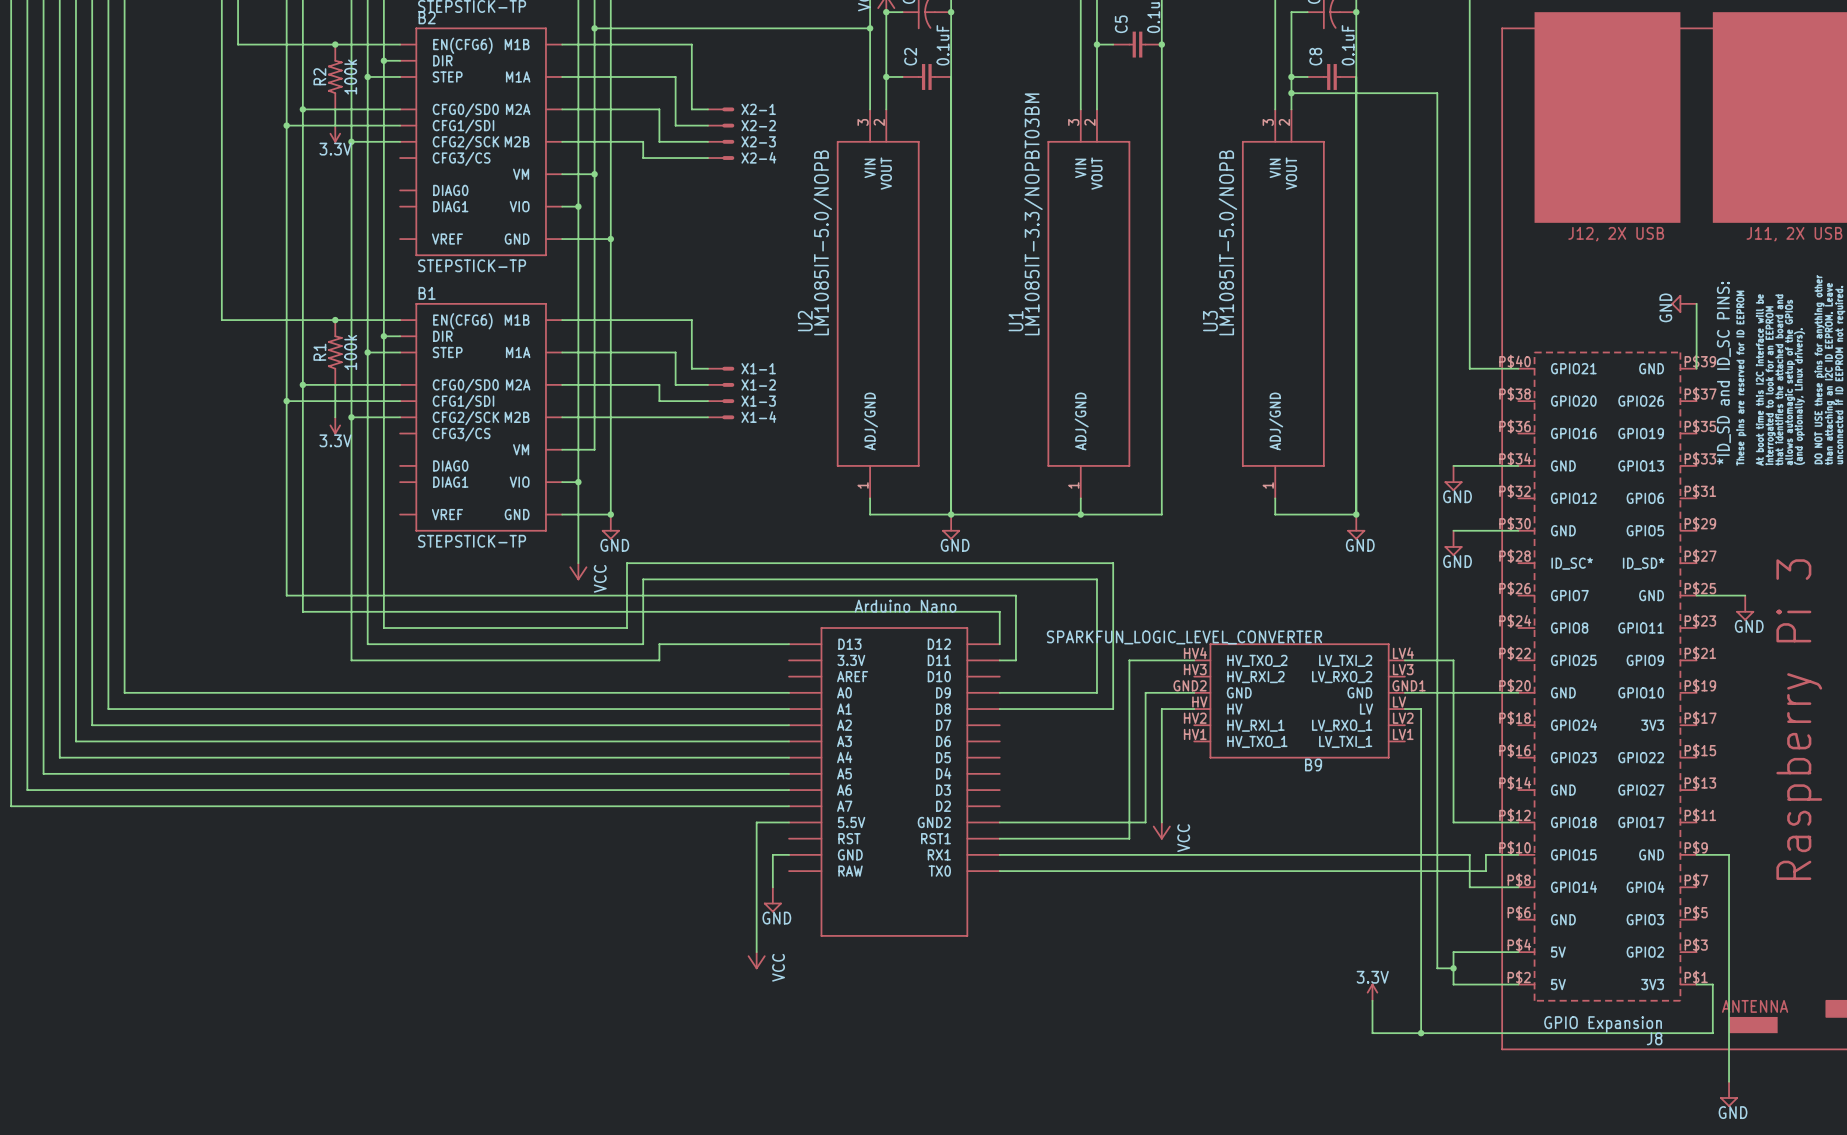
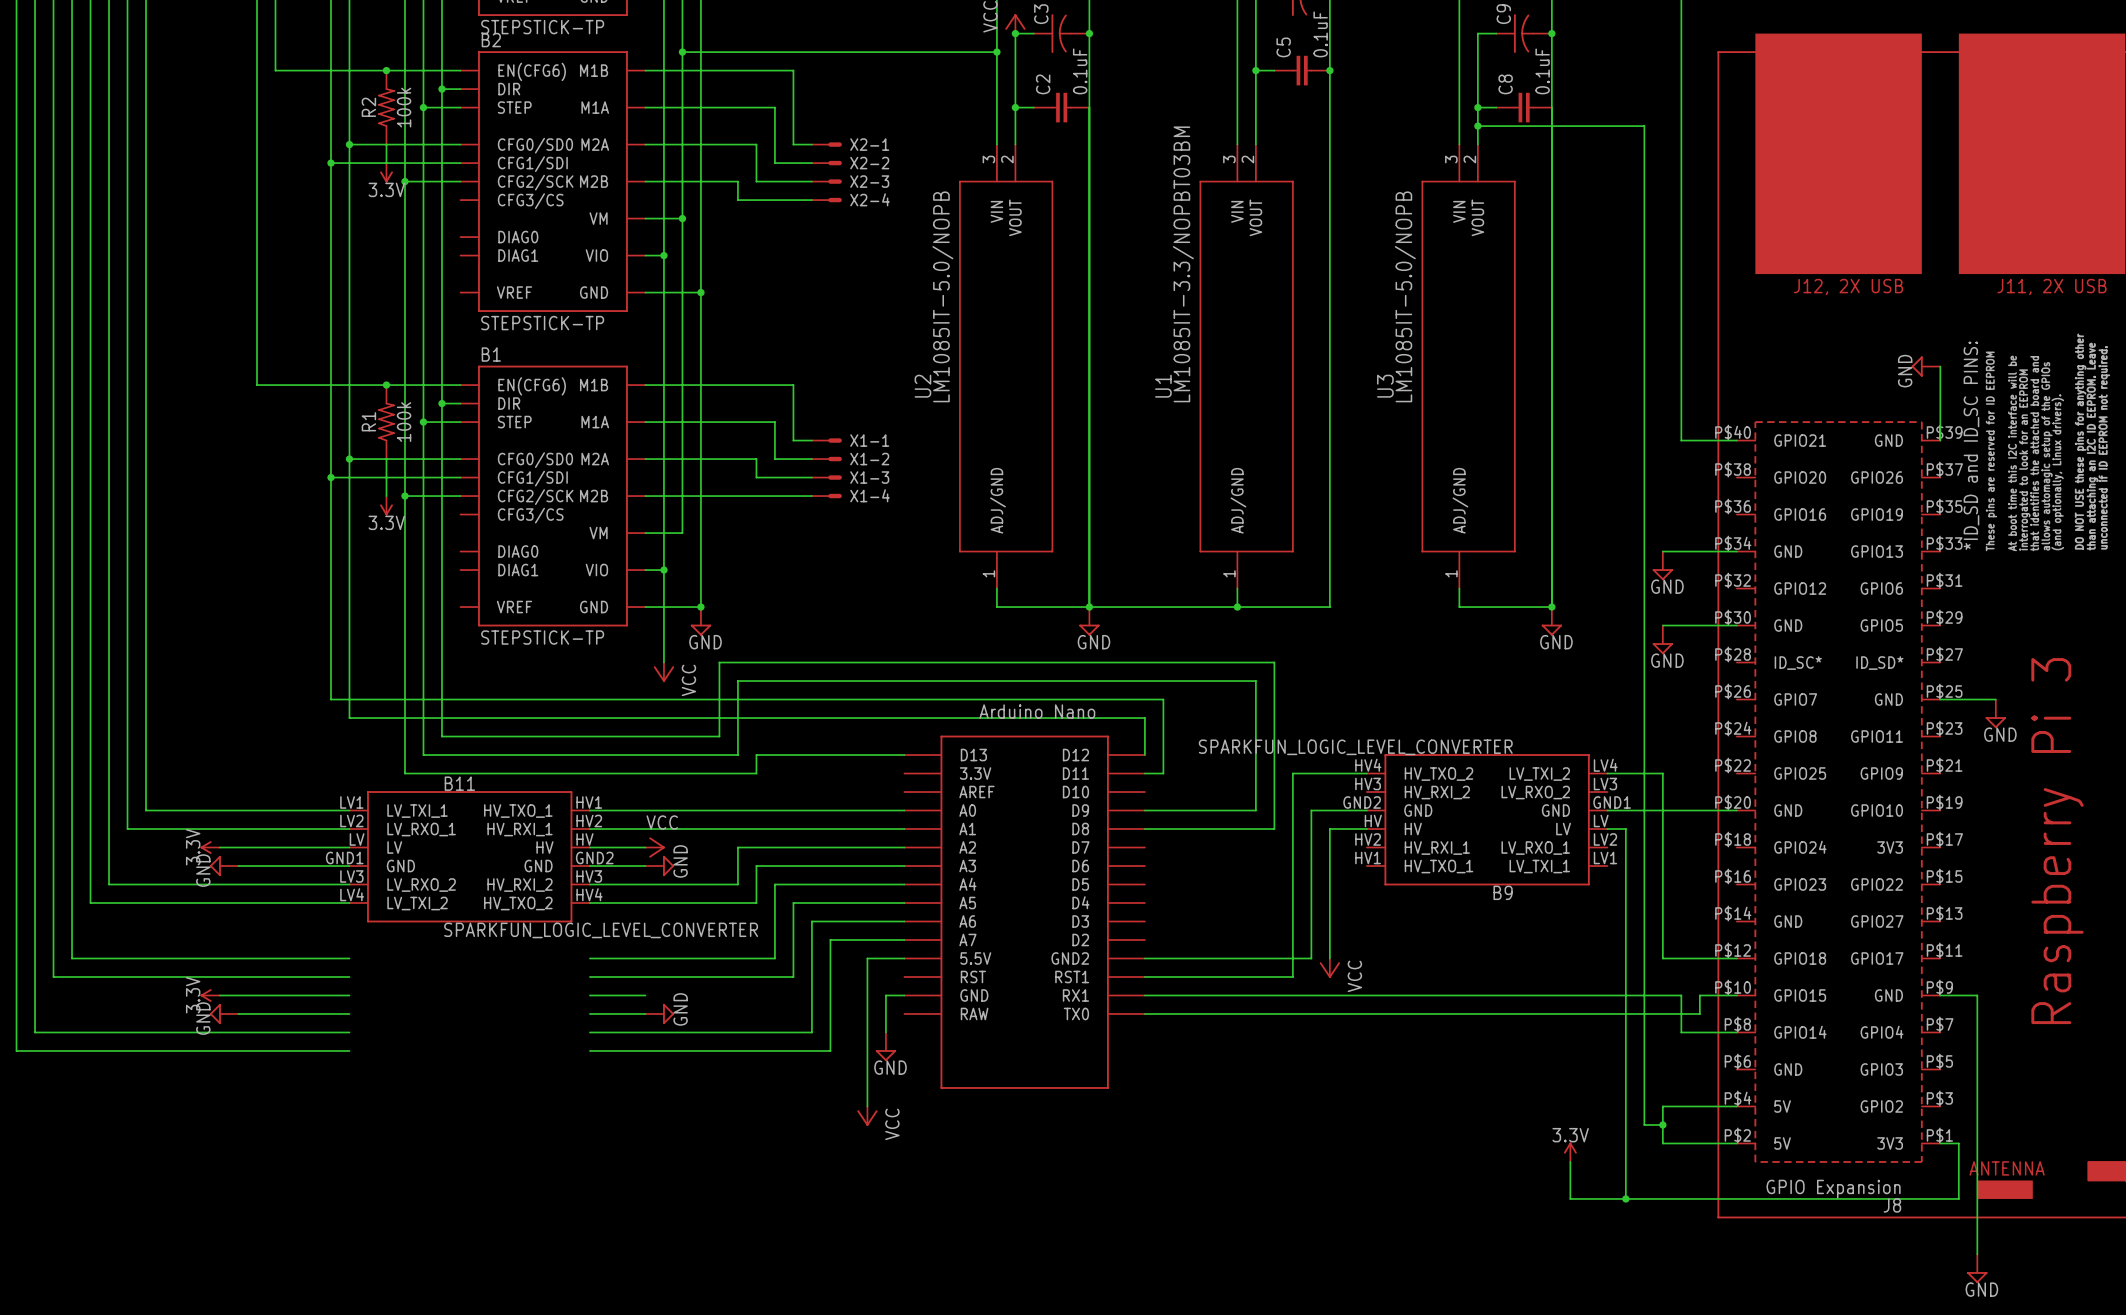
wire: (302, 692) (513, 692) -> none
wire: (302, 709) (513, 709) -> none
wire: (92, 725) (189, 725) -> none
power symbol: none -> 3.3V (210, 847)
wire: (302, 725) (513, 725) -> none
wire: (562, 725) (643, 725) -> none
power symbol: none -> VCC (655, 847)
B11: none -> SPARKFUN_LOGIC_LEVEL_CONVERTER (469, 856)
wire: (75, 741) (205, 741) -> none
power symbol: none -> GND (224, 866)
wire: (302, 741) (513, 741) -> none
wire: (562, 741) (659, 741) -> none
power symbol: none -> GND (659, 866)
wire: (59, 757) (92, 757) -> (109, 847) (109, 884)
wire: none -> (72, 884) (72, 958) (349, 958)
wire: (302, 757) (513, 757) -> none
wire: (643, 757) (675, 757) -> (737, 884) (737, 847)
wire: none -> (774, 884) (774, 958) (589, 958)
wire: (43, 773) (75, 773) -> (90, 866) (90, 903)
wire: none -> (53, 903) (53, 976) (349, 976)
wire: (302, 773) (513, 773) -> none
wire: (659, 773) (691, 773) -> (756, 903) (756, 866)
wire: none -> (793, 903) (793, 976) (589, 976)
wire: (27, 790) (708, 790) -> (35, 921) (35, 1032) (349, 1032)
wire: none -> (811, 921) (811, 1032) (589, 1032)
wire: (11, 806) (724, 806) -> (16, 940) (16, 1050) (349, 1050)
wire: none -> (830, 940) (830, 1050) (589, 1050)
power symbol: none -> 3.3V (210, 995)
wire: none -> (220, 995) (349, 995)
wire: none -> (589, 995) (645, 995)
power symbol: none -> GND (224, 1013)
wire: none -> (238, 1013) (349, 1013)
wire: none -> (589, 1013) (645, 1013)
power symbol: none -> GND (659, 1013)

